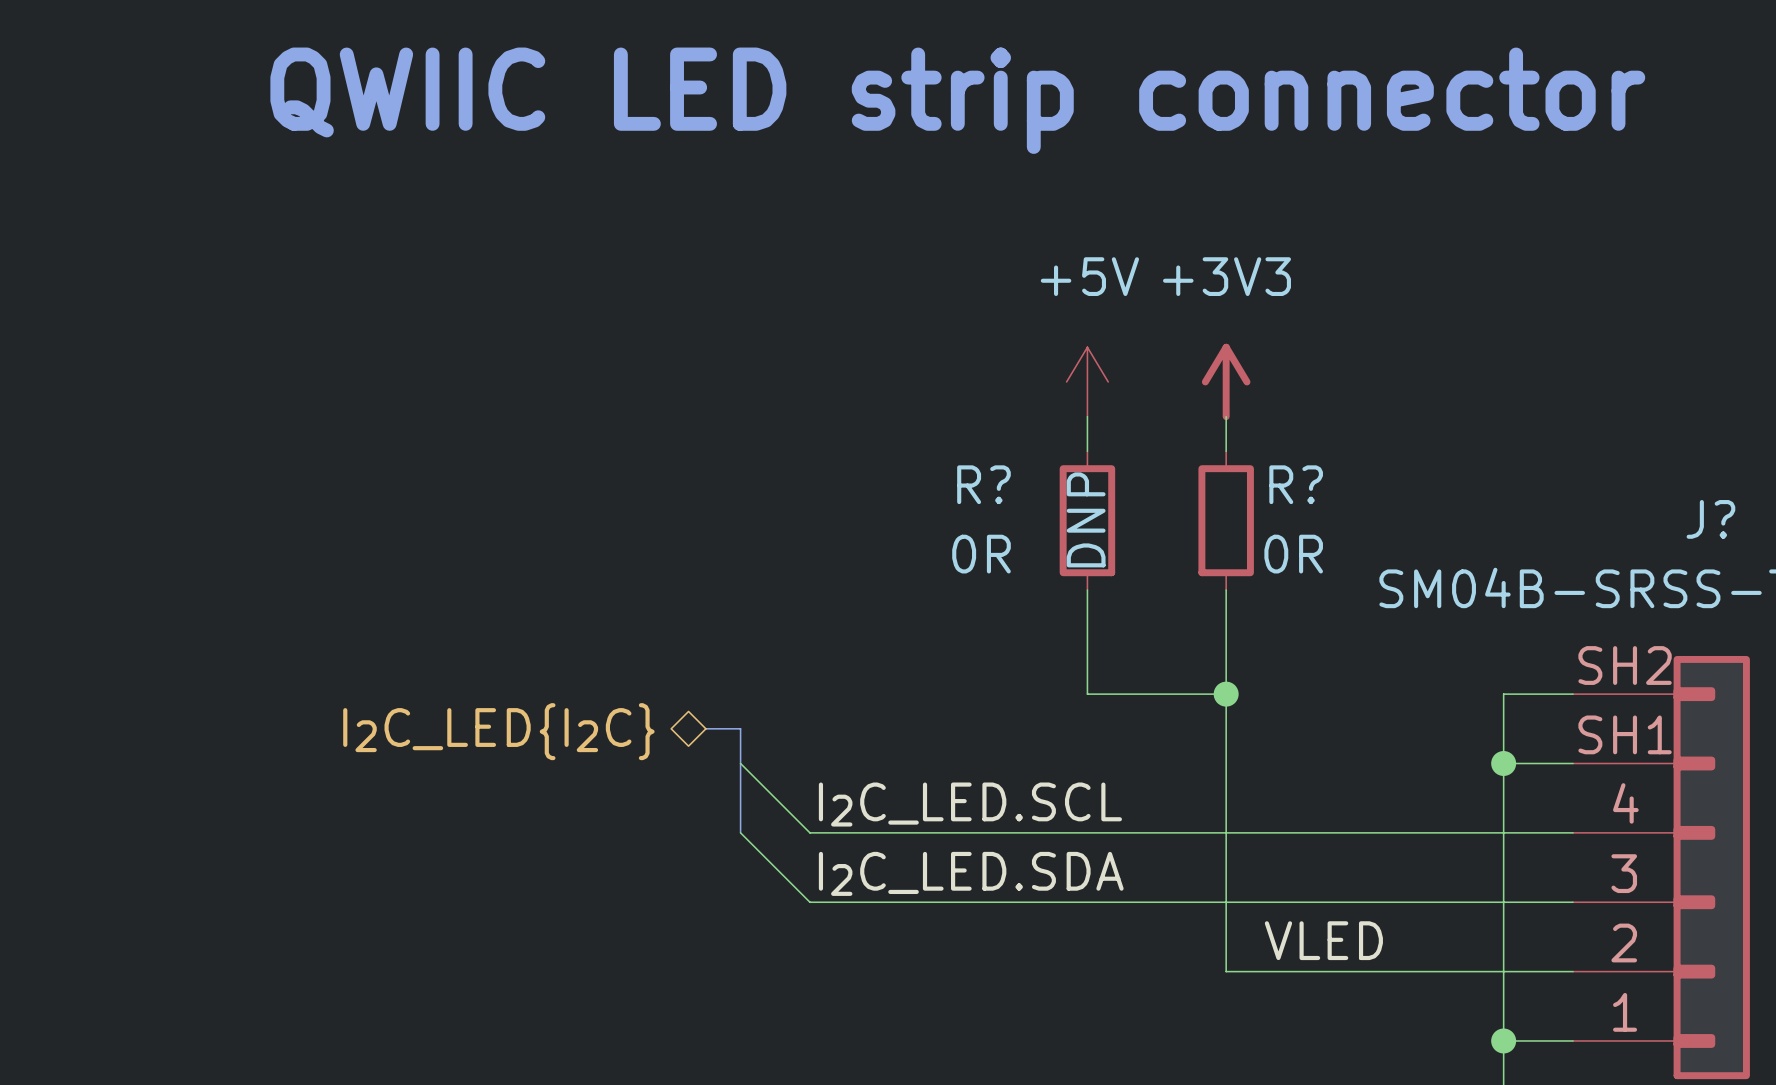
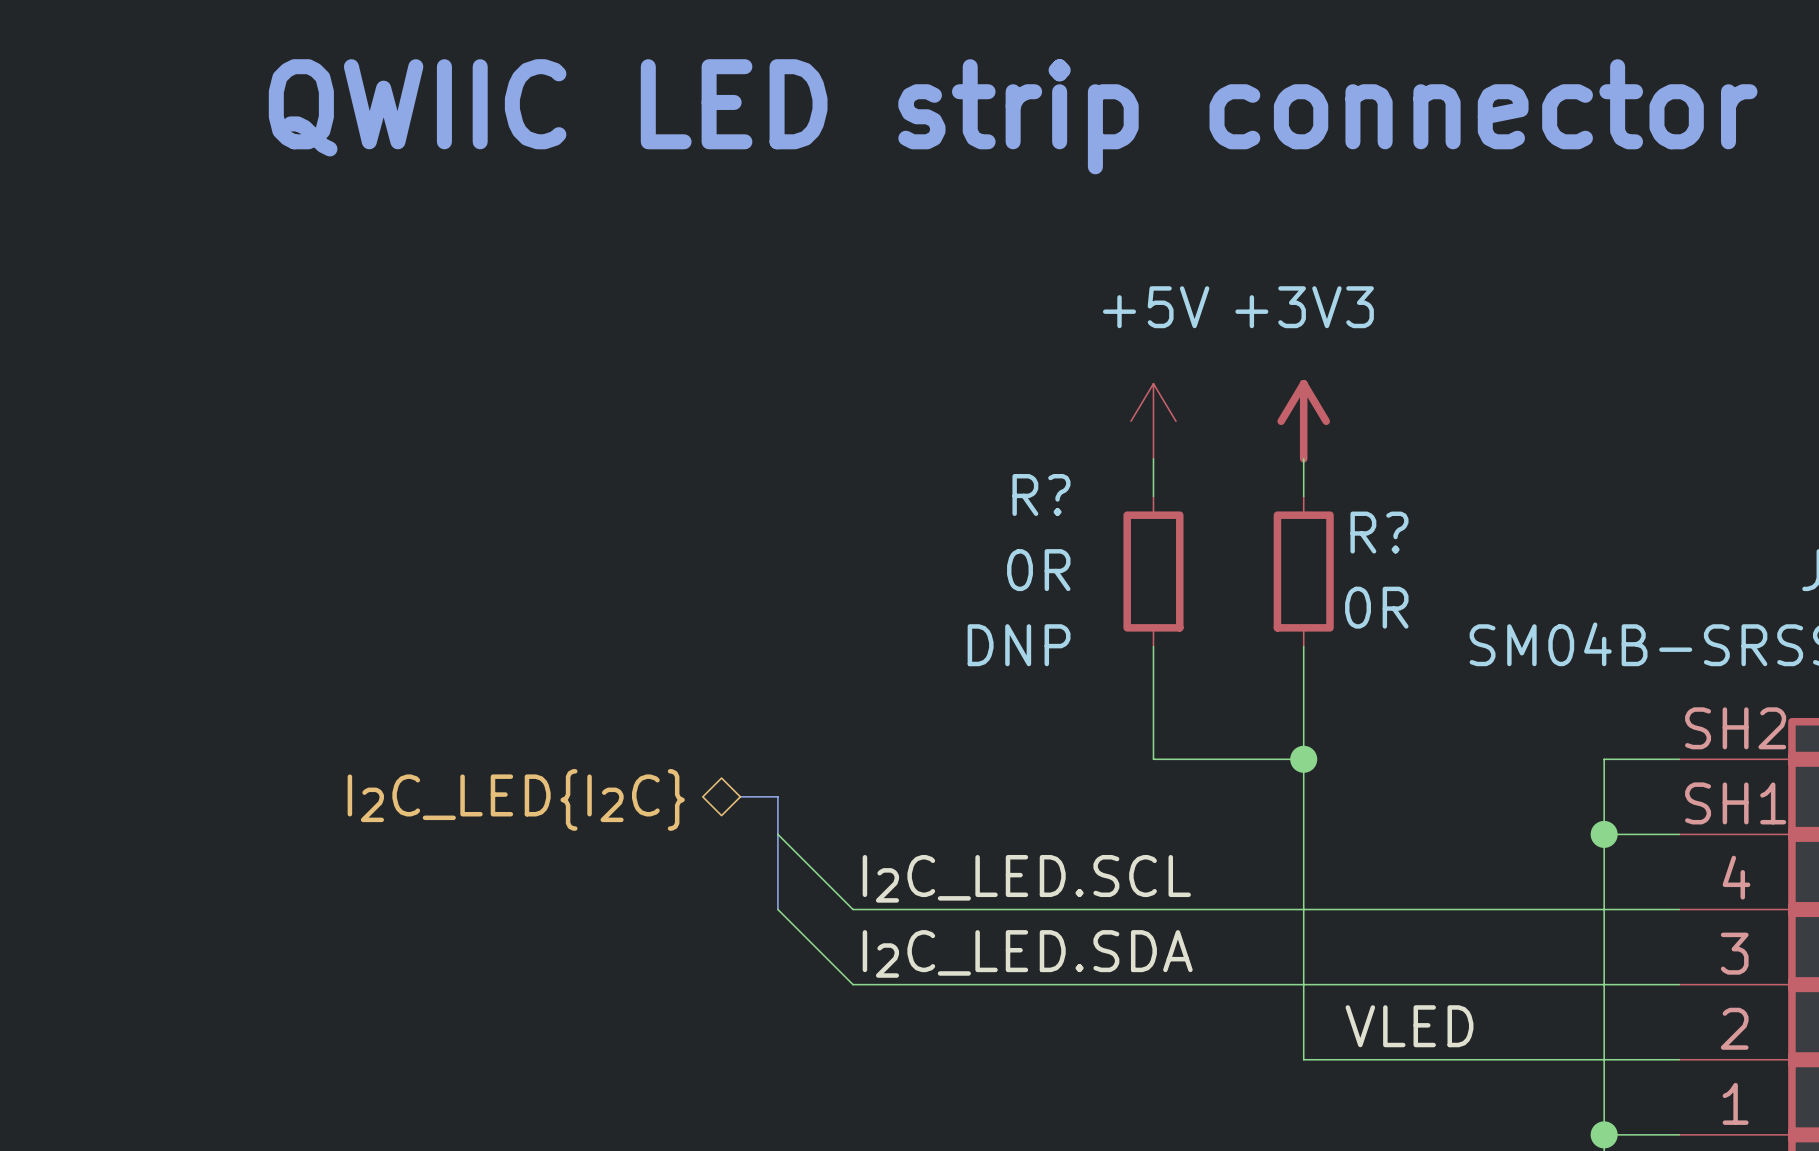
R? name position: R? (983, 484) -> R? (1041, 494)
R? text rotation: 0° (1086, 519) -> 90° clockwise (1019, 645)
R? text position: DNP (1086, 519) -> DNP (1019, 645)
R? text position: 0R (981, 554) -> 0R (1038, 570)

